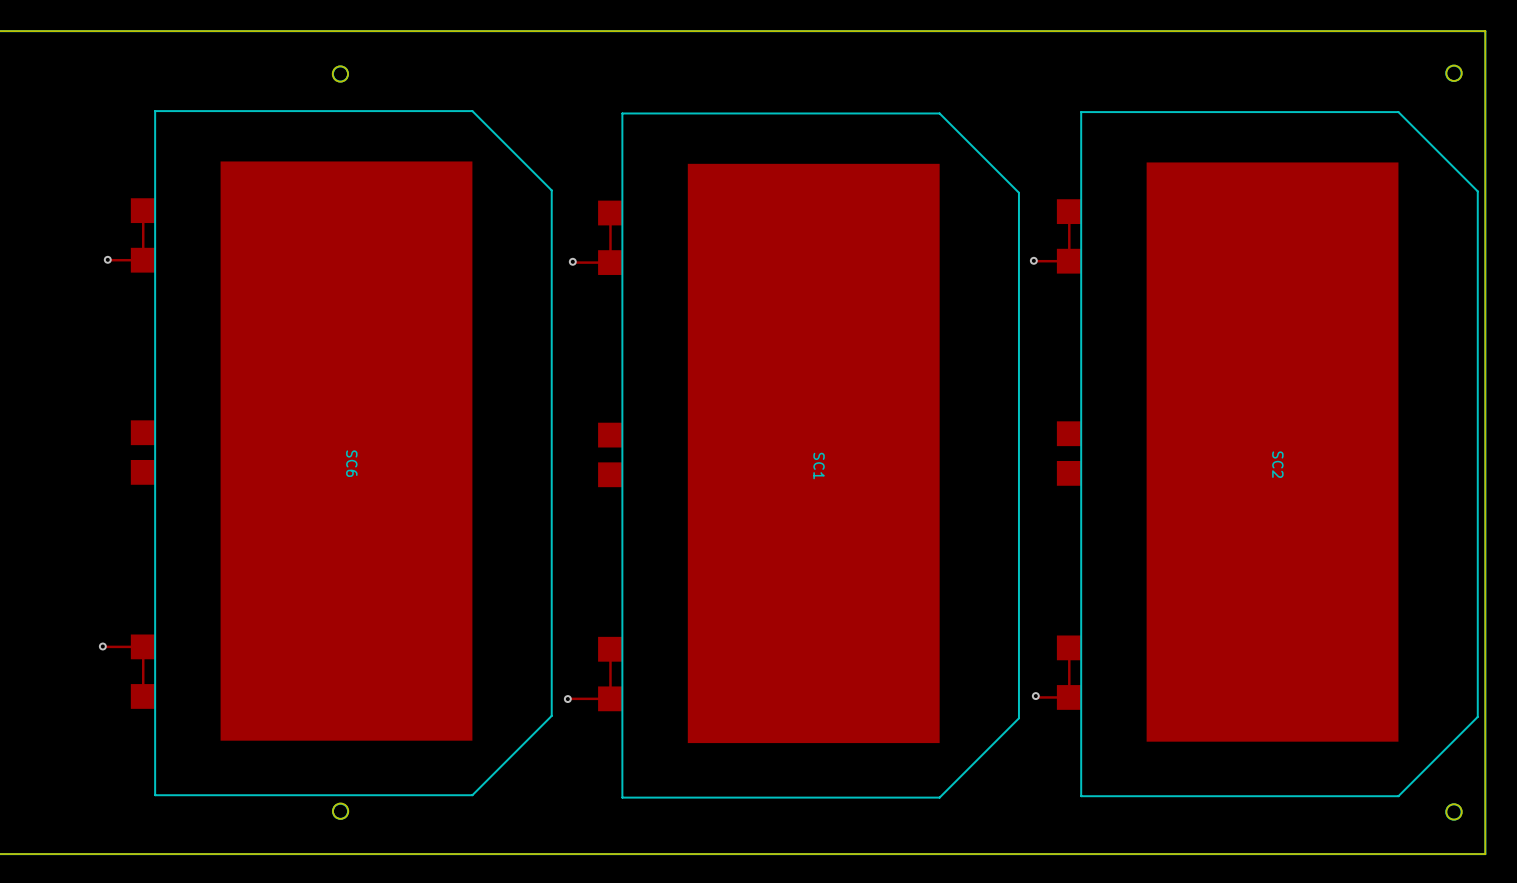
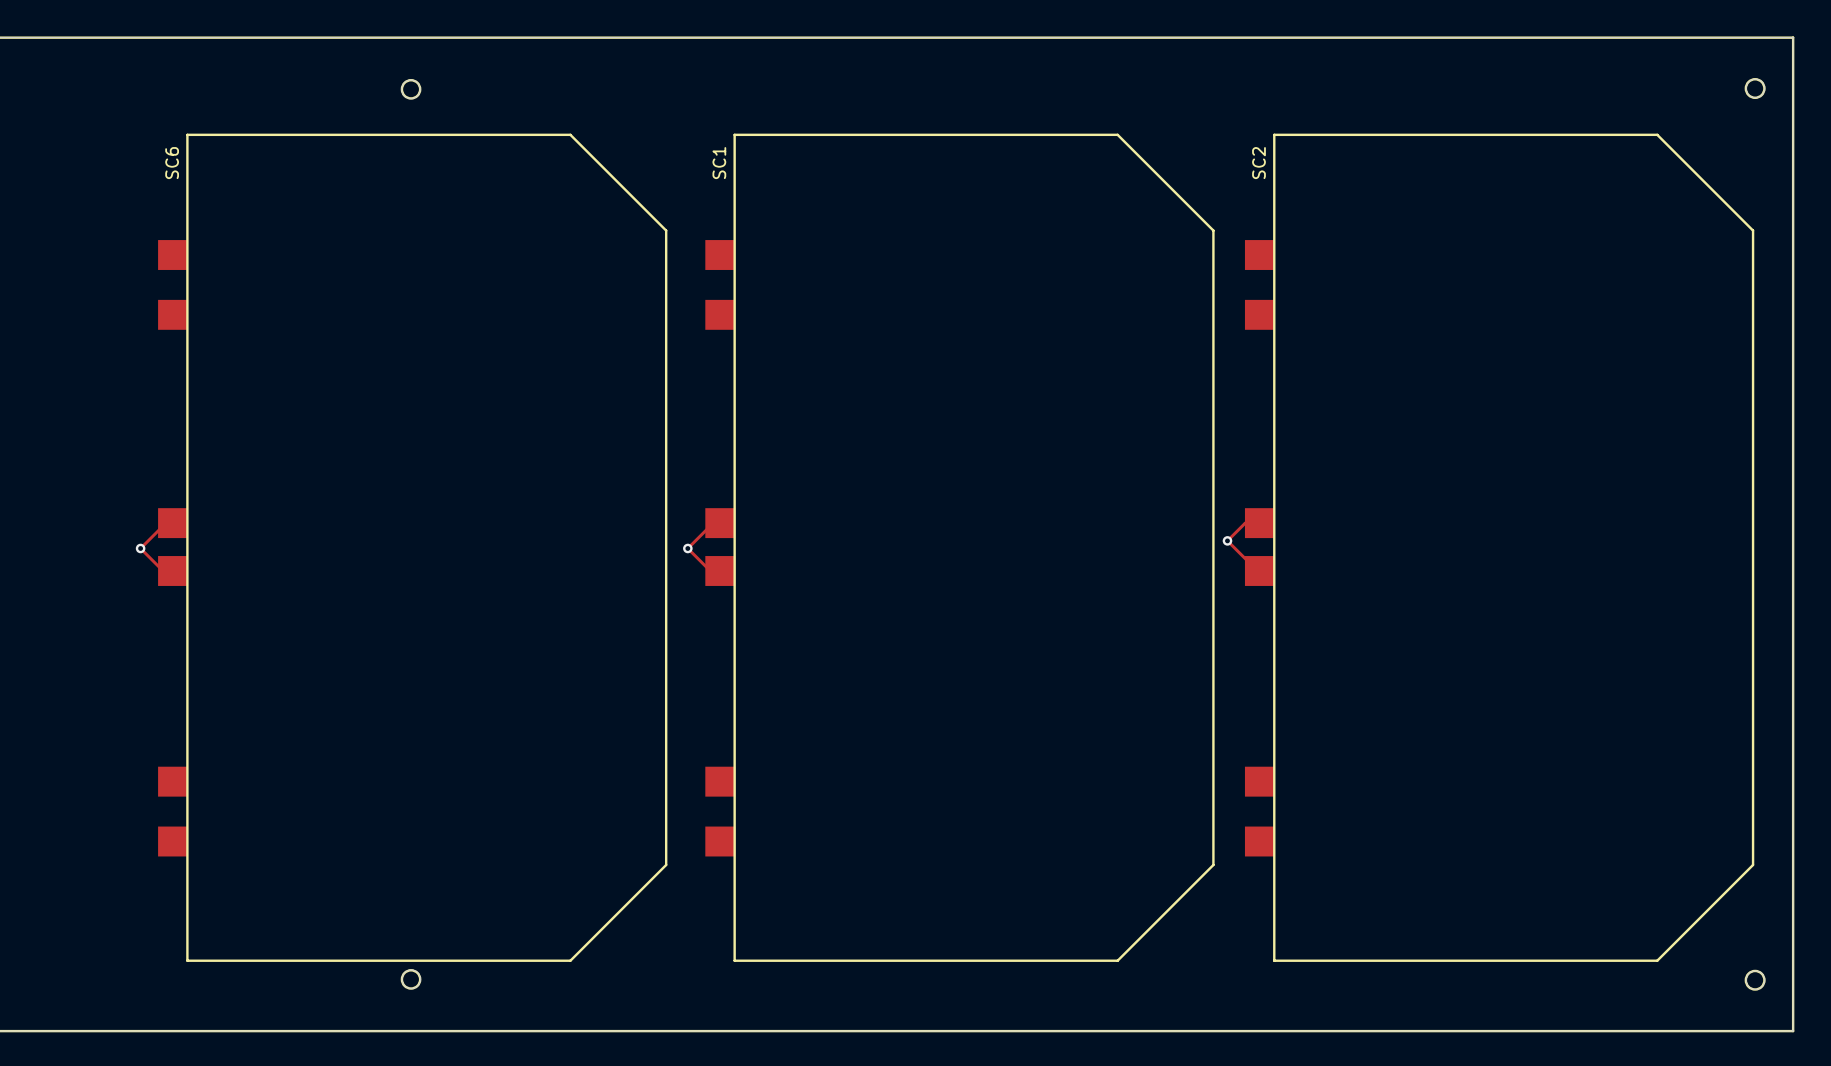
SC6 footprint: [130, 110, 553, 797] -> [158, 133, 668, 962]
SC2 footprint: [1056, 111, 1479, 798] -> [1244, 133, 1755, 962]
SC1 footprint: [598, 112, 1020, 799] -> [705, 133, 1215, 962]
track: (143, 210) (143, 260) (107, 259) -> none
track: (1069, 211) (1069, 261) (1033, 260) -> none
track: (610, 213) (610, 262) (572, 261) -> none
via: (107, 259) -> none
via: (1033, 260) -> none
via: (572, 261) -> none
track: none -> (173, 523) (165, 523) (140, 548) (163, 571) (173, 571)
track: none -> (720, 523) (713, 523) (687, 548) (710, 571) (720, 571)
track: none -> (1259, 523) (1245, 523) (1227, 540) (1257, 571) (1259, 571)
via: none -> (1227, 540)
via: none -> (140, 548)
via: none -> (687, 548)
SC6 name position: SC6 (351, 463) -> SC6 (172, 163)
SC2 name position: SC2 (1277, 464) -> SC2 (1258, 163)
SC1 name position: SC1 (819, 466) -> SC1 (719, 163)
track: (102, 646) (143, 646) (143, 696) -> none
via: (102, 646) -> none
track: (1069, 647) (1069, 697) (1035, 696) -> none
track: (610, 649) (610, 698) (567, 699) -> none
via: (1035, 696) -> none
via: (567, 699) -> none

